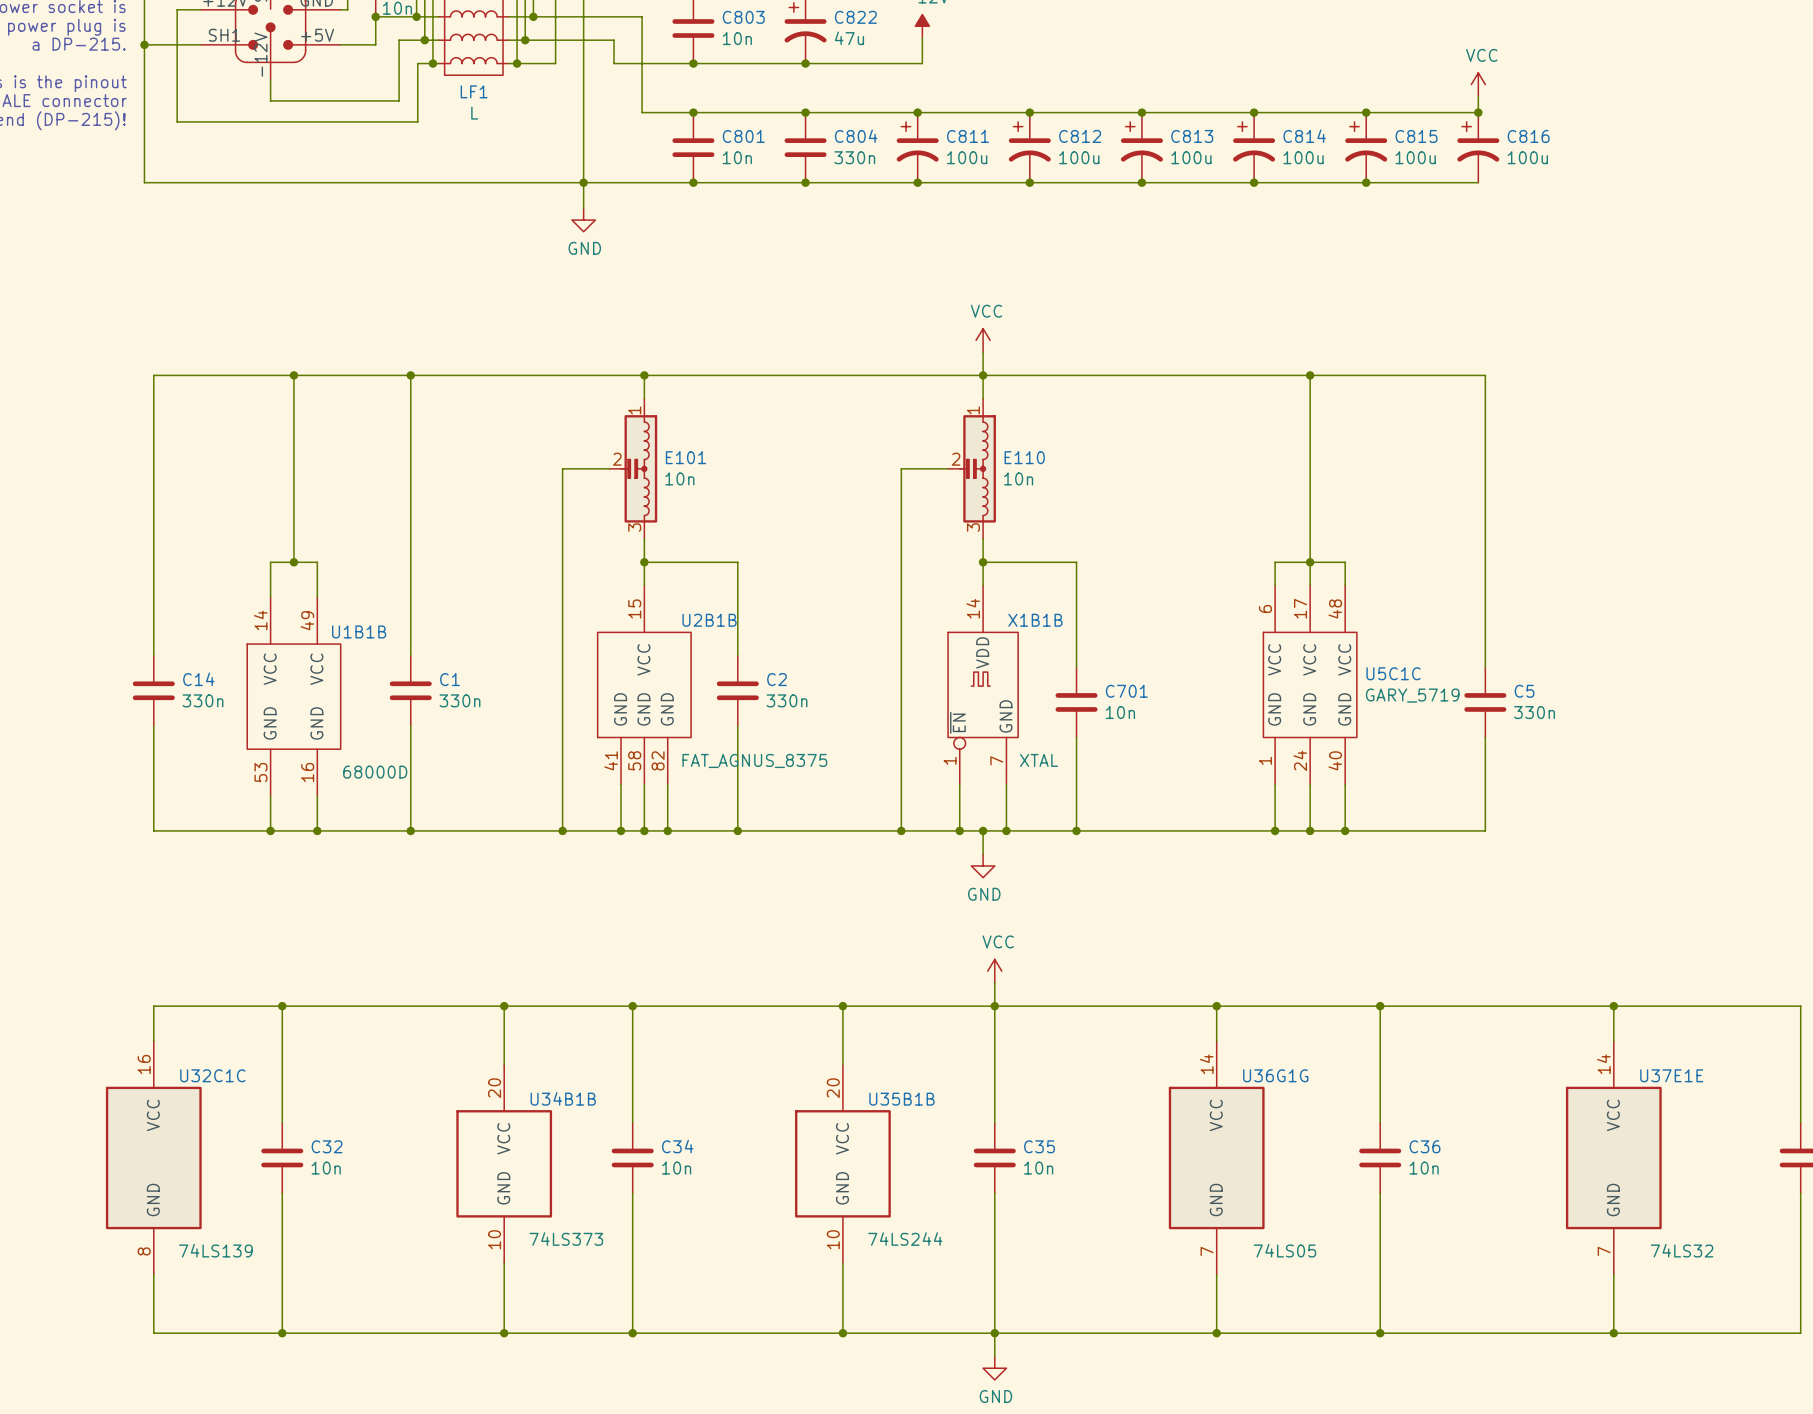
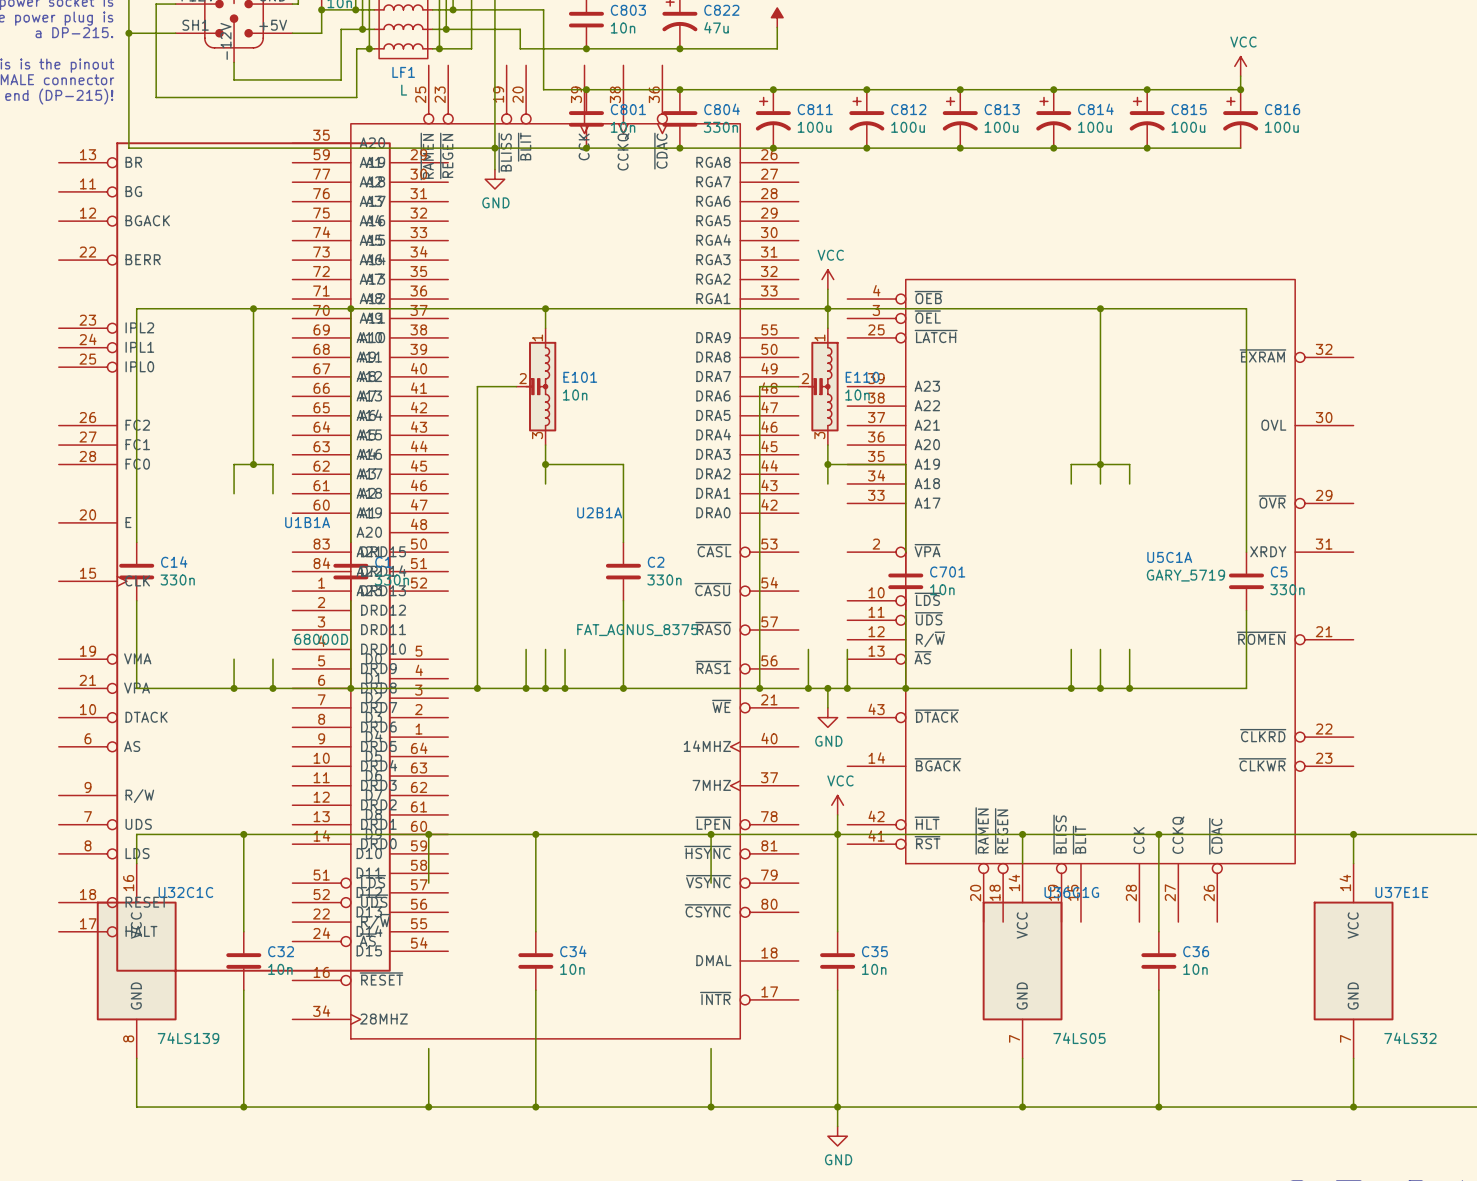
U2B1A: none -> FAT_AGNUS_8375 (545, 552)
U1B1A: none -> 68000D (253, 556)
U2B1B: FAT_AGNUS_8375 (644, 684) -> none
X1B1B: XTAL (983, 684) -> none
U5C1C: GARY_5719 (1310, 684) -> none
U1B1B: 68000D (293, 696) -> none
U5C1A: none -> GARY_5719 (1100, 600)
U34B1B: 74LS373 (504, 1163) -> none
U35B1B: 74LS244 (842, 1163) -> none

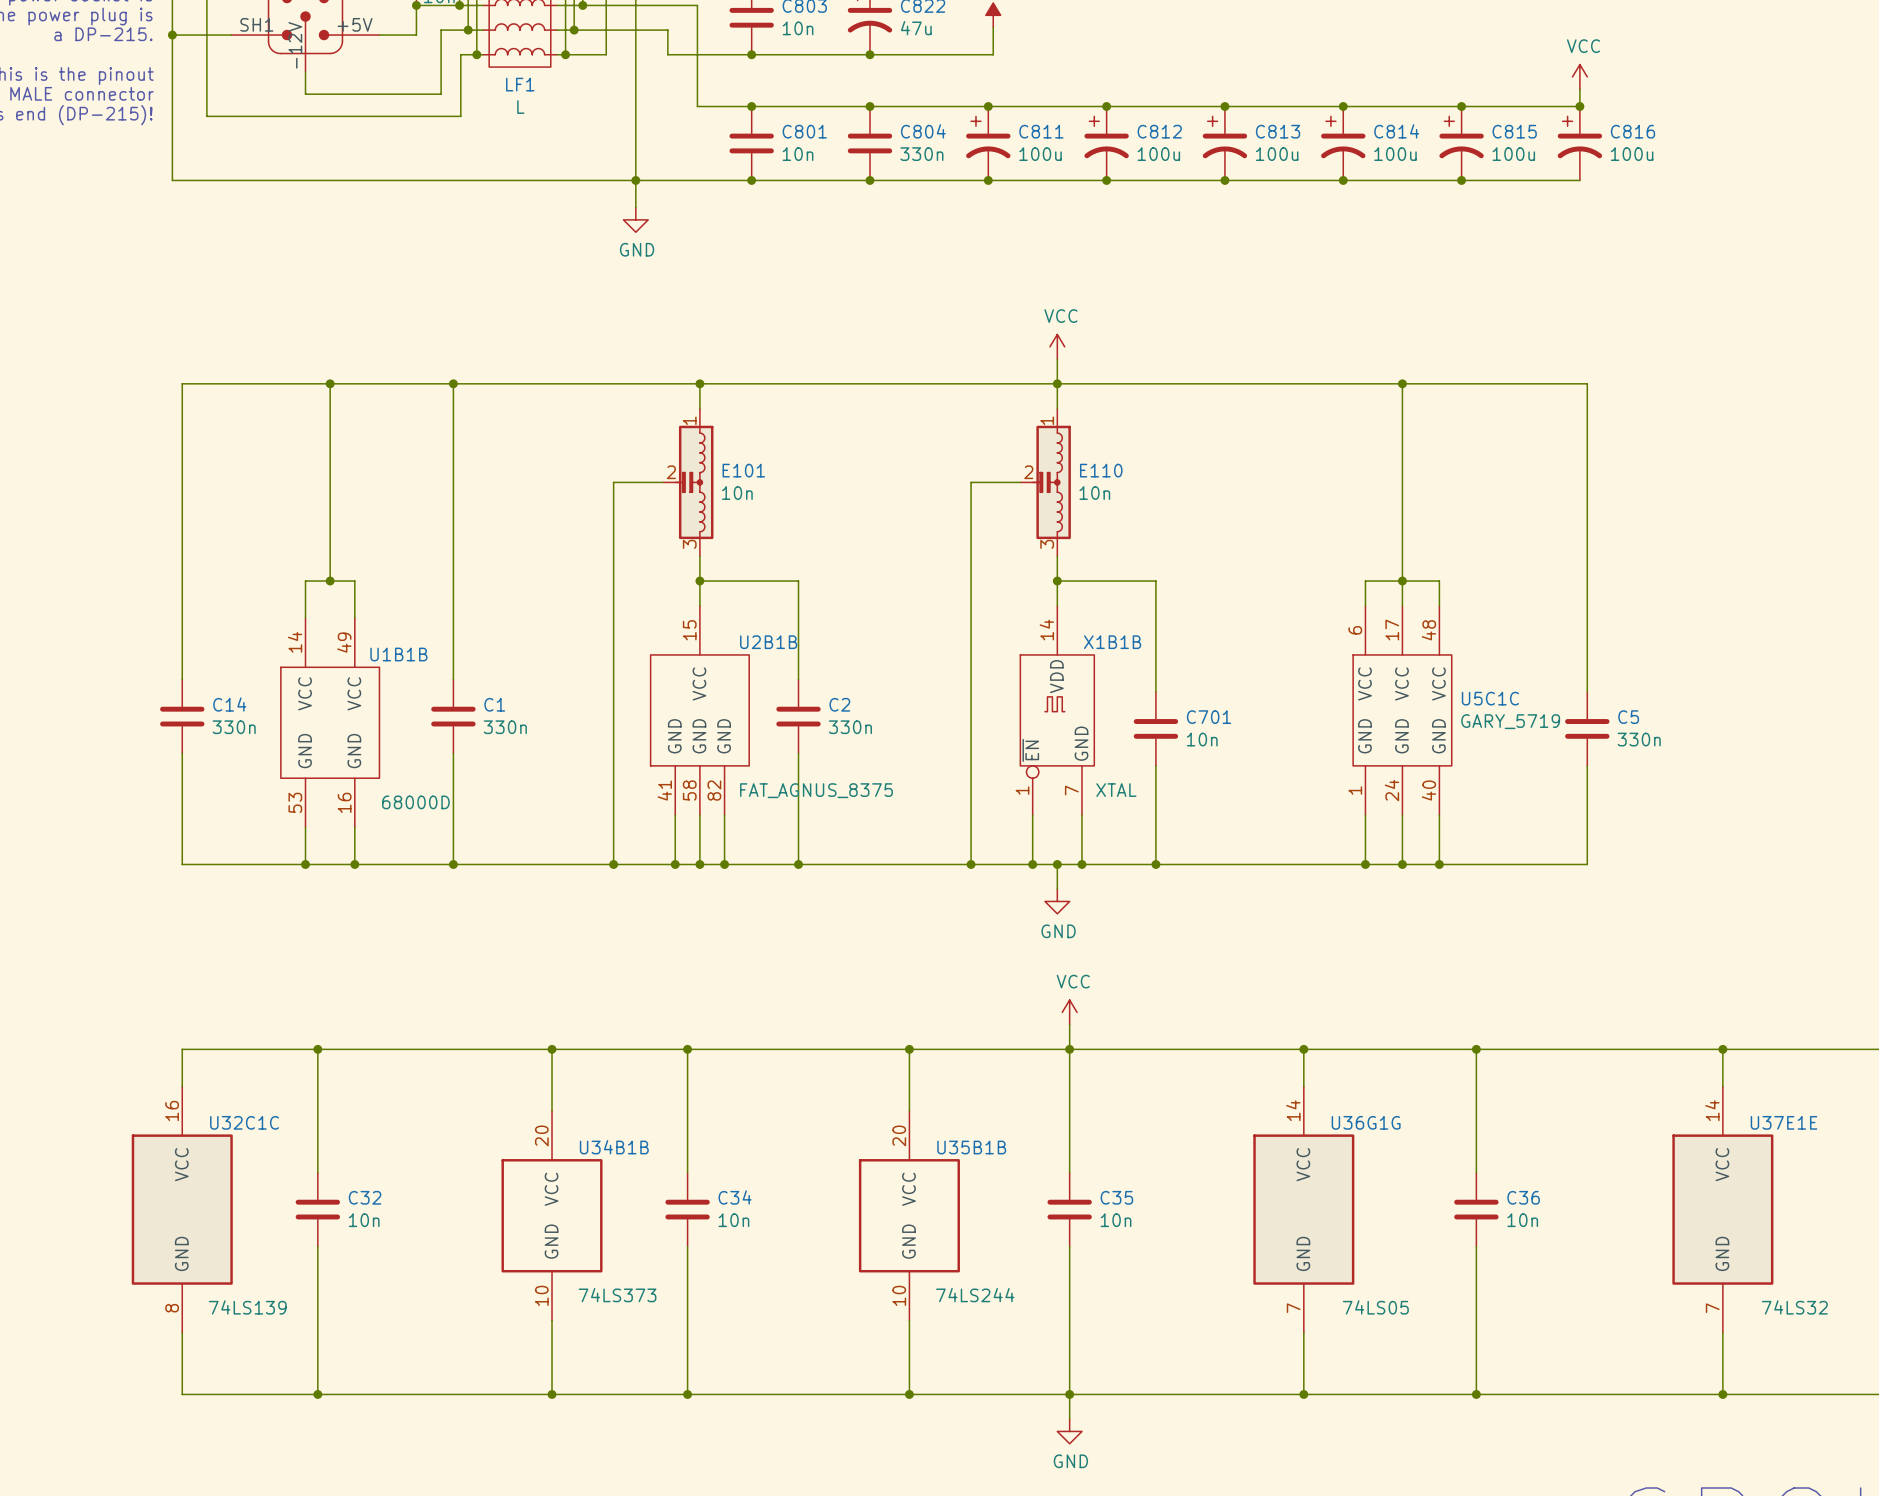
U2B1A: FAT_AGNUS_8375 (545, 552) -> none
U1B1A: 68000D (253, 556) -> none
U2B1B: none -> FAT_AGNUS_8375 (699, 710)
X1B1B: none -> XTAL (1057, 710)
U5C1C: none -> GARY_5719 (1402, 710)
U1B1B: none -> 68000D (330, 722)
U5C1A: GARY_5719 (1100, 600) -> none
U34B1B: none -> 74LS373 (552, 1215)
U35B1B: none -> 74LS244 (909, 1215)

